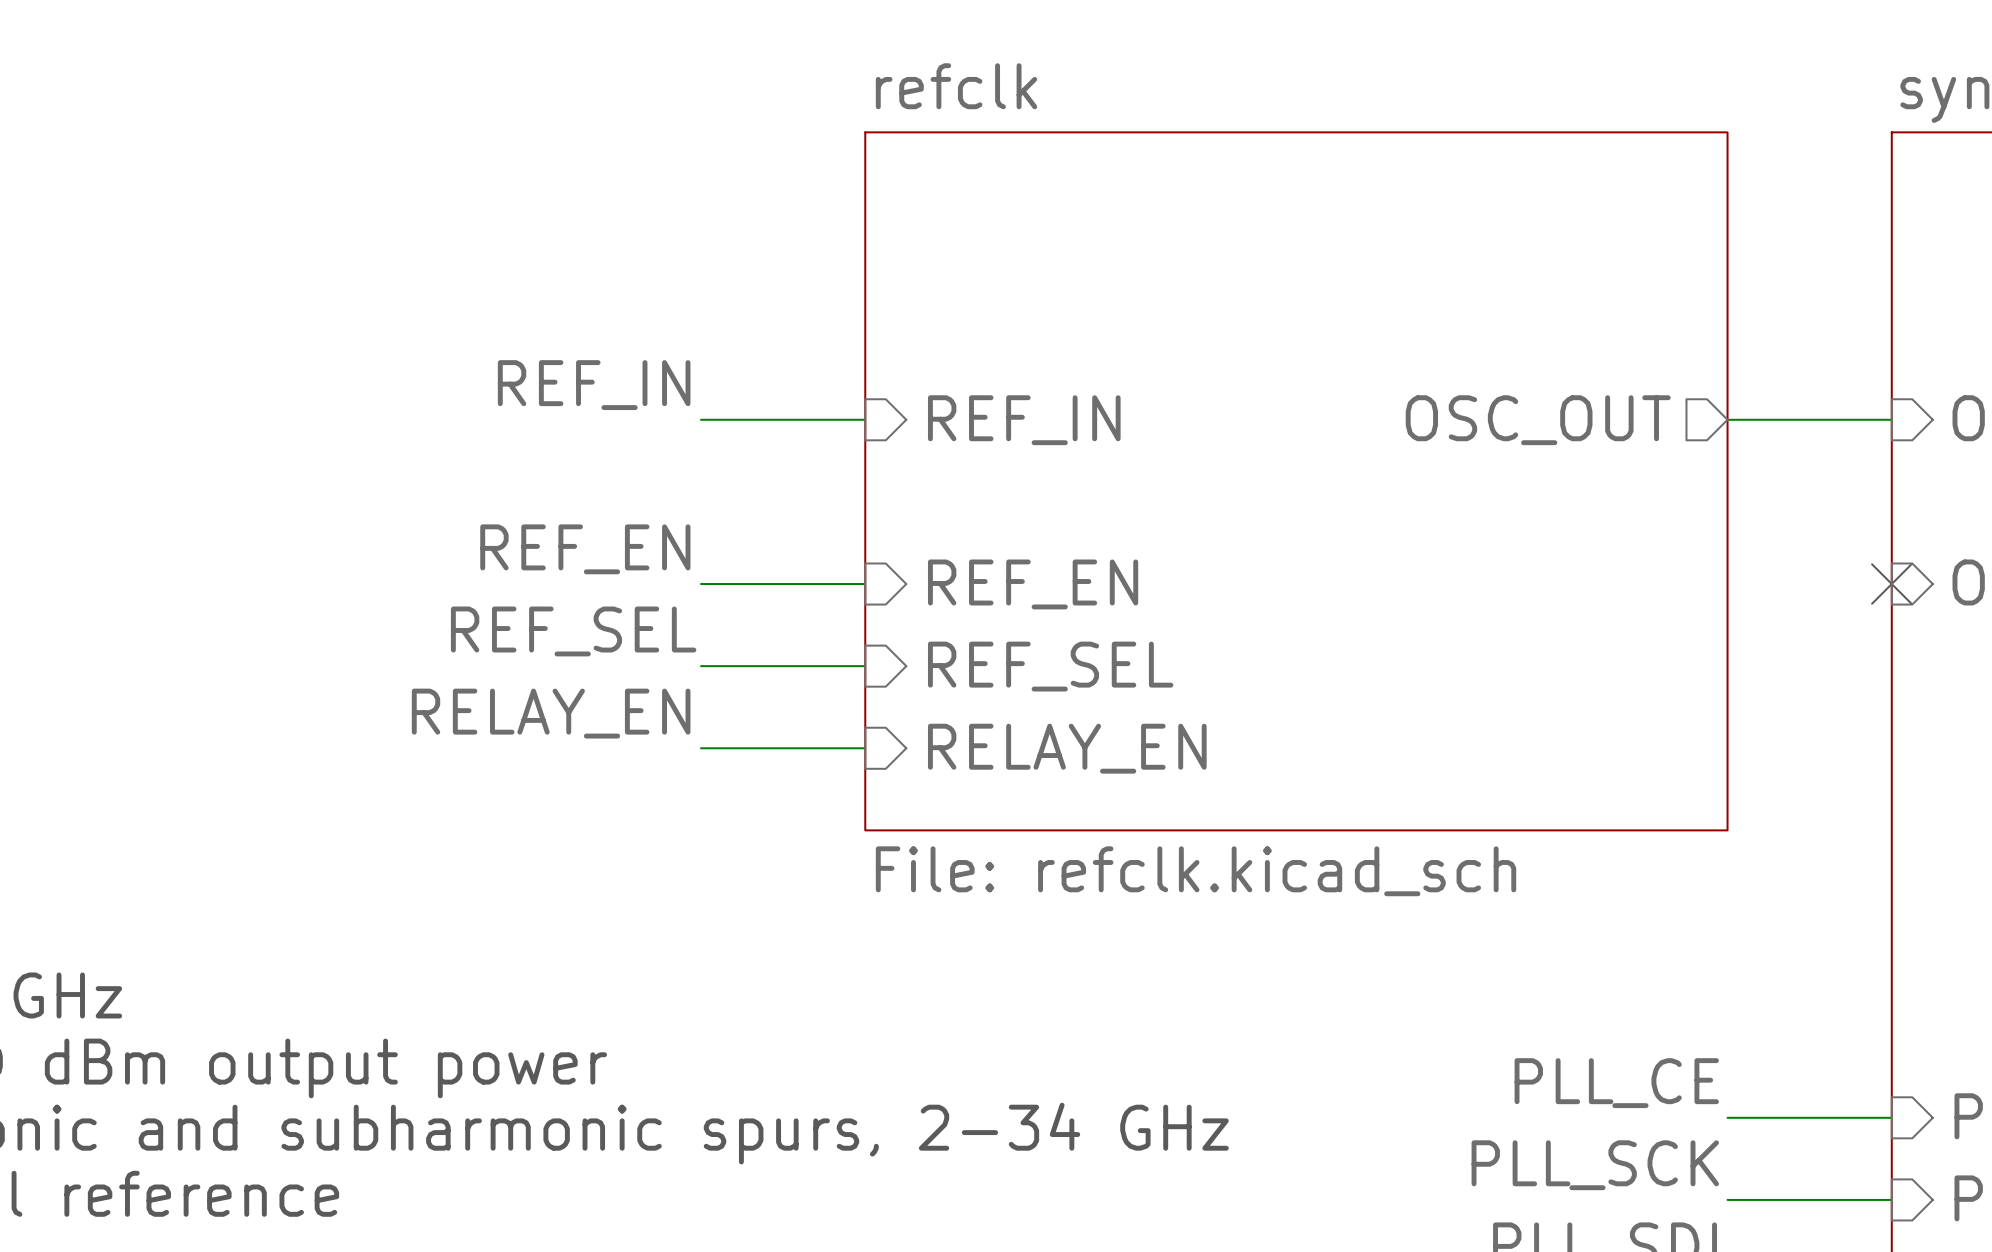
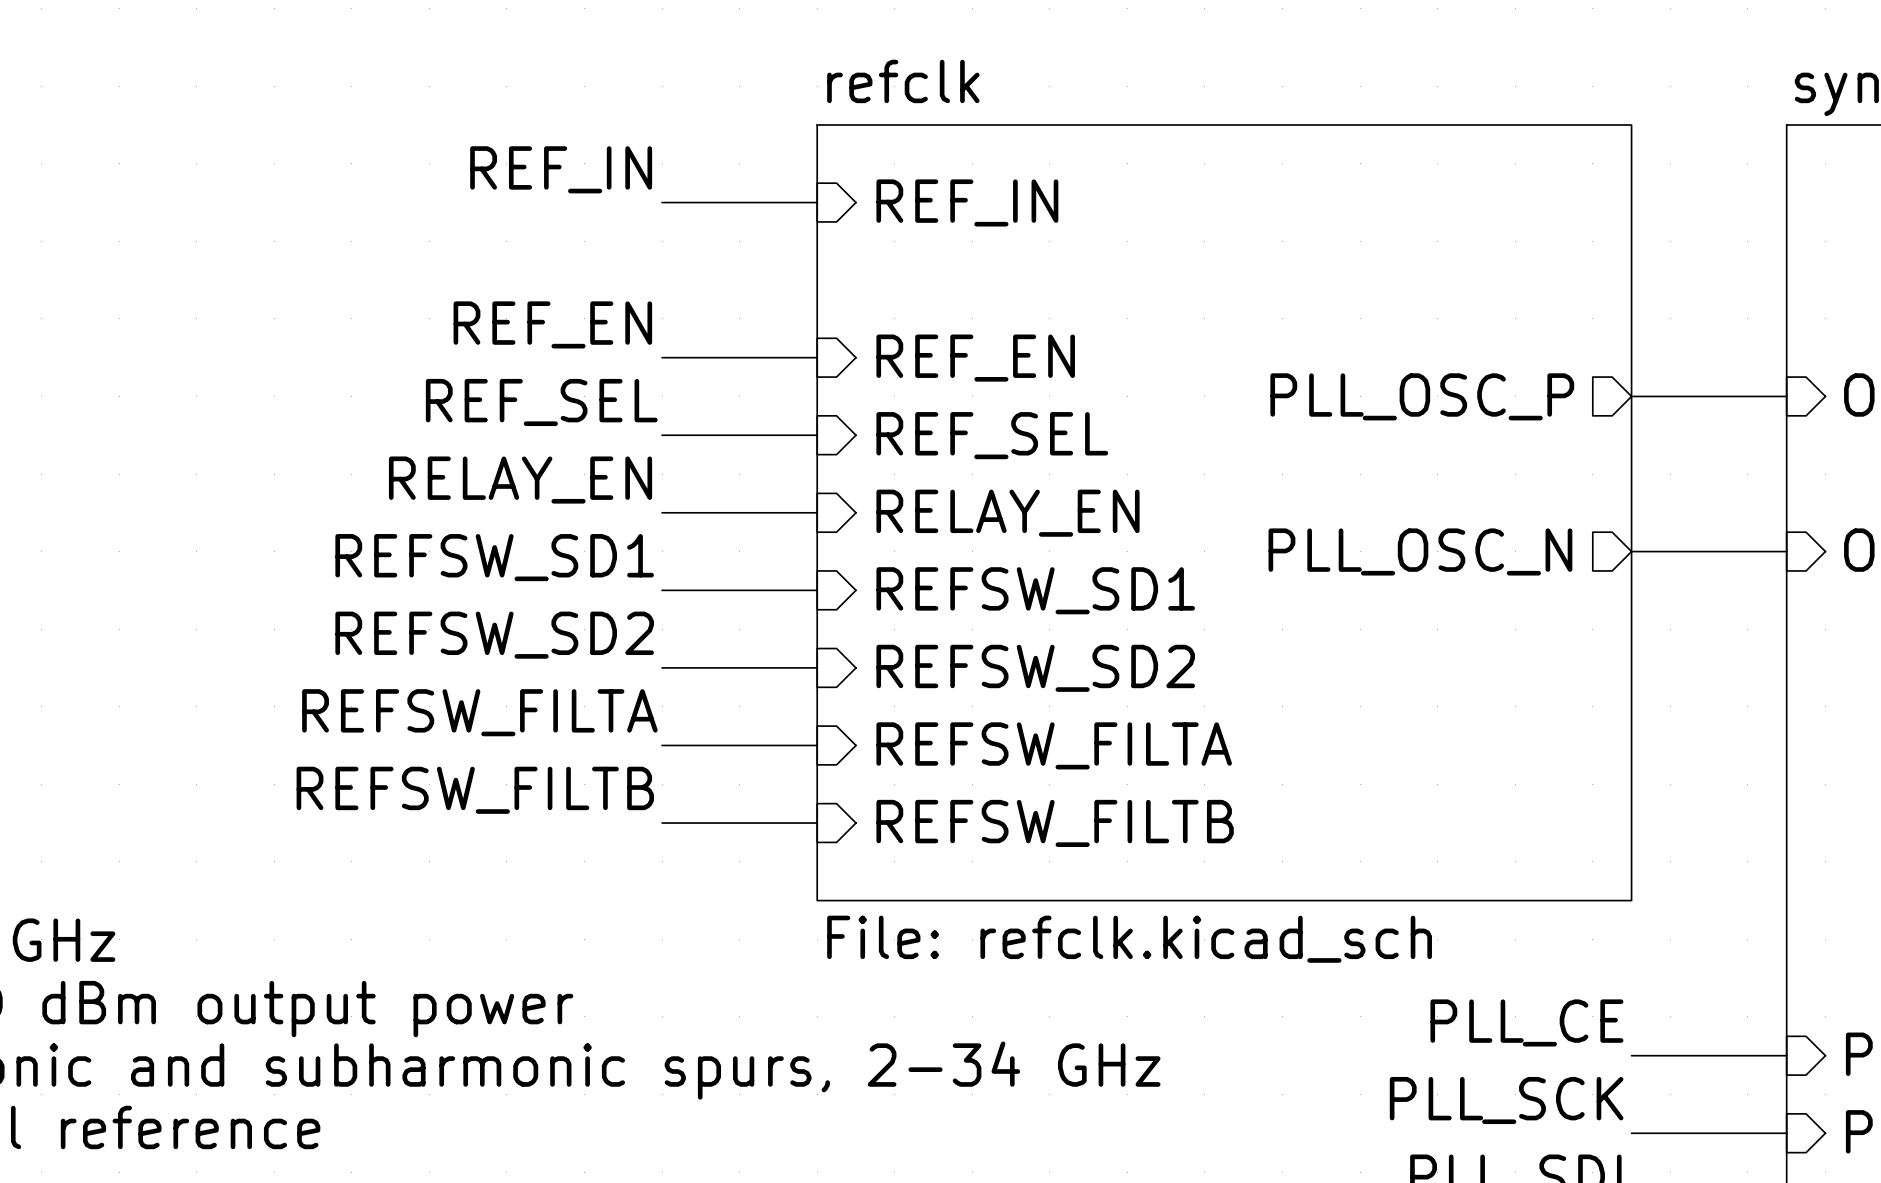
wire: none -> (662, 202) (817, 202)
label position: REF_IN (594, 385) -> REF_IN (561, 169)
wire: (701, 419) (865, 419) -> (662, 357) (817, 357)
sheet pin position: REF_IN (1024, 420) -> REF_IN (967, 202)
sheet pin: OSC_OUT (1538, 420) -> PLL_OSC_P (1422, 396)
wire: none -> (662, 435) (817, 435)
sheet refclk: File: refclk.kicad_sch (1296, 481) -> none
wire: none -> (662, 512) (817, 512)
sheet refclk: none -> File: refclk.kicad_sch (1224, 512)
label position: REF_EN (585, 549) -> REF_EN (552, 324)
wire: (701, 584) (865, 584) -> (662, 590) (817, 590)
sheet pin position: REF_EN (1033, 584) -> REF_EN (975, 358)
sheet pin: none -> PLL_OSC_N (1420, 551)
wire: none -> (1631, 551) (1786, 551)
no-connect mark: (1891, 584) -> none
label: none -> REFSW_SD1 (494, 557)
sheet pin: none -> REFSW_SD1 (1035, 590)
label position: REF_SEL (573, 631) -> REF_SEL (541, 402)
wire: (701, 666) (865, 666) -> (662, 667) (817, 667)
sheet pin position: REF_SEL (1050, 666) -> REF_SEL (992, 435)
label: none -> REFSW_SD2 (494, 635)
sheet pin: none -> REFSW_SD2 (1035, 668)
label position: RELAY_EN (551, 713) -> RELAY_EN (520, 480)
wire: (701, 748) (865, 748) -> (662, 745) (817, 745)
sheet pin position: RELAY_EN (1067, 748) -> RELAY_EN (1008, 513)
label: none -> REFSW_FILTA (479, 712)
sheet pin: none -> REFSW_FILTA (1054, 745)
label: none -> REFSW_FILTB (475, 790)
wire: none -> (662, 823) (817, 823)
sheet pin: none -> REFSW_FILTB (1055, 823)

